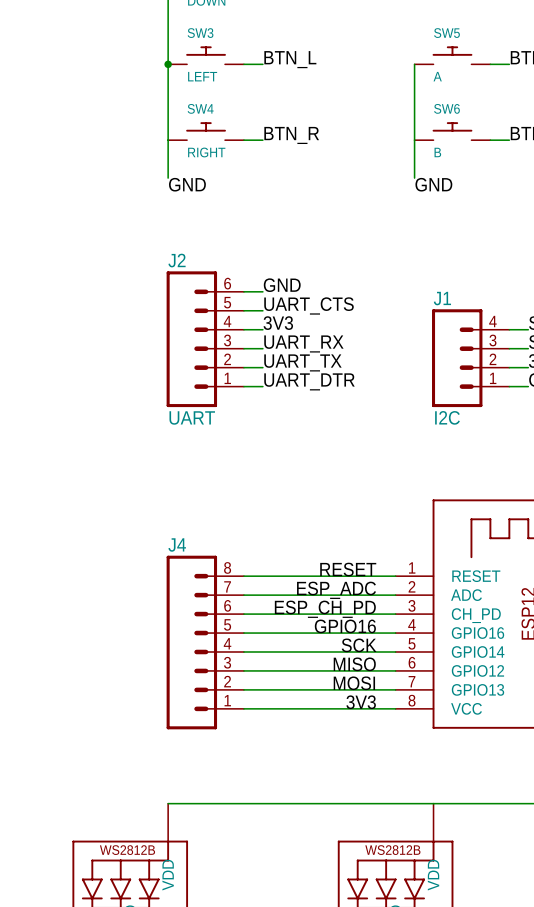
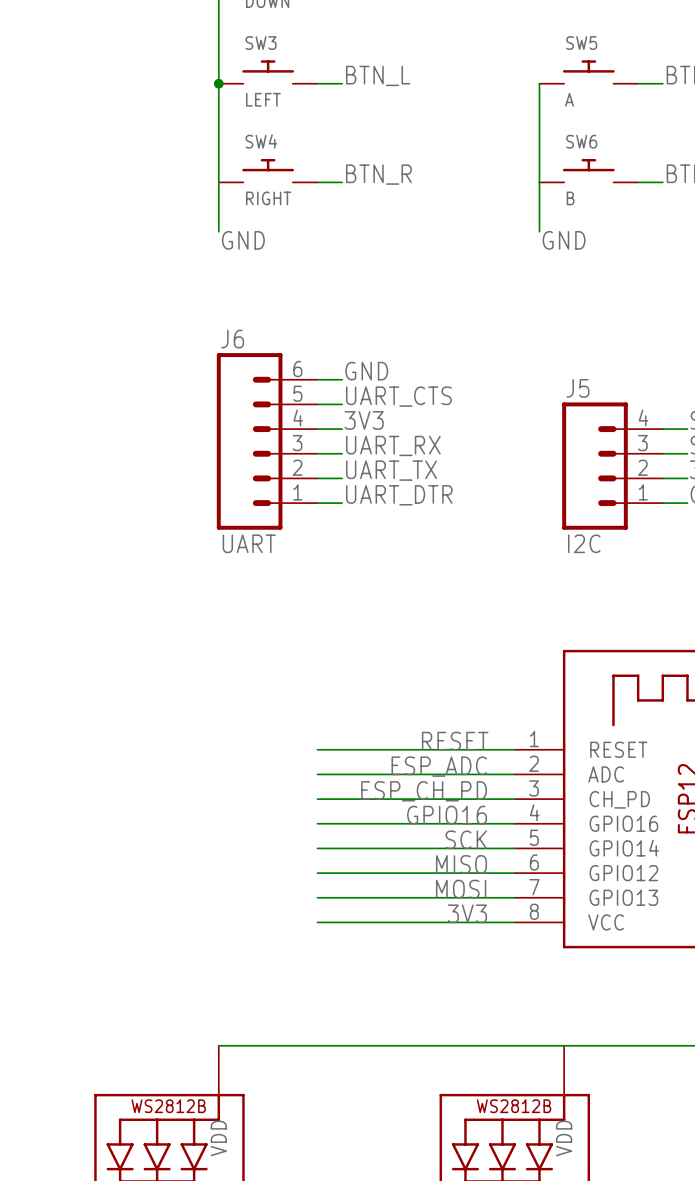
J2 name: J2 (177, 260) -> J6 (232, 339)
J1 name: J1 (442, 298) -> J5 (578, 388)
J4: (205, 642) -> none

